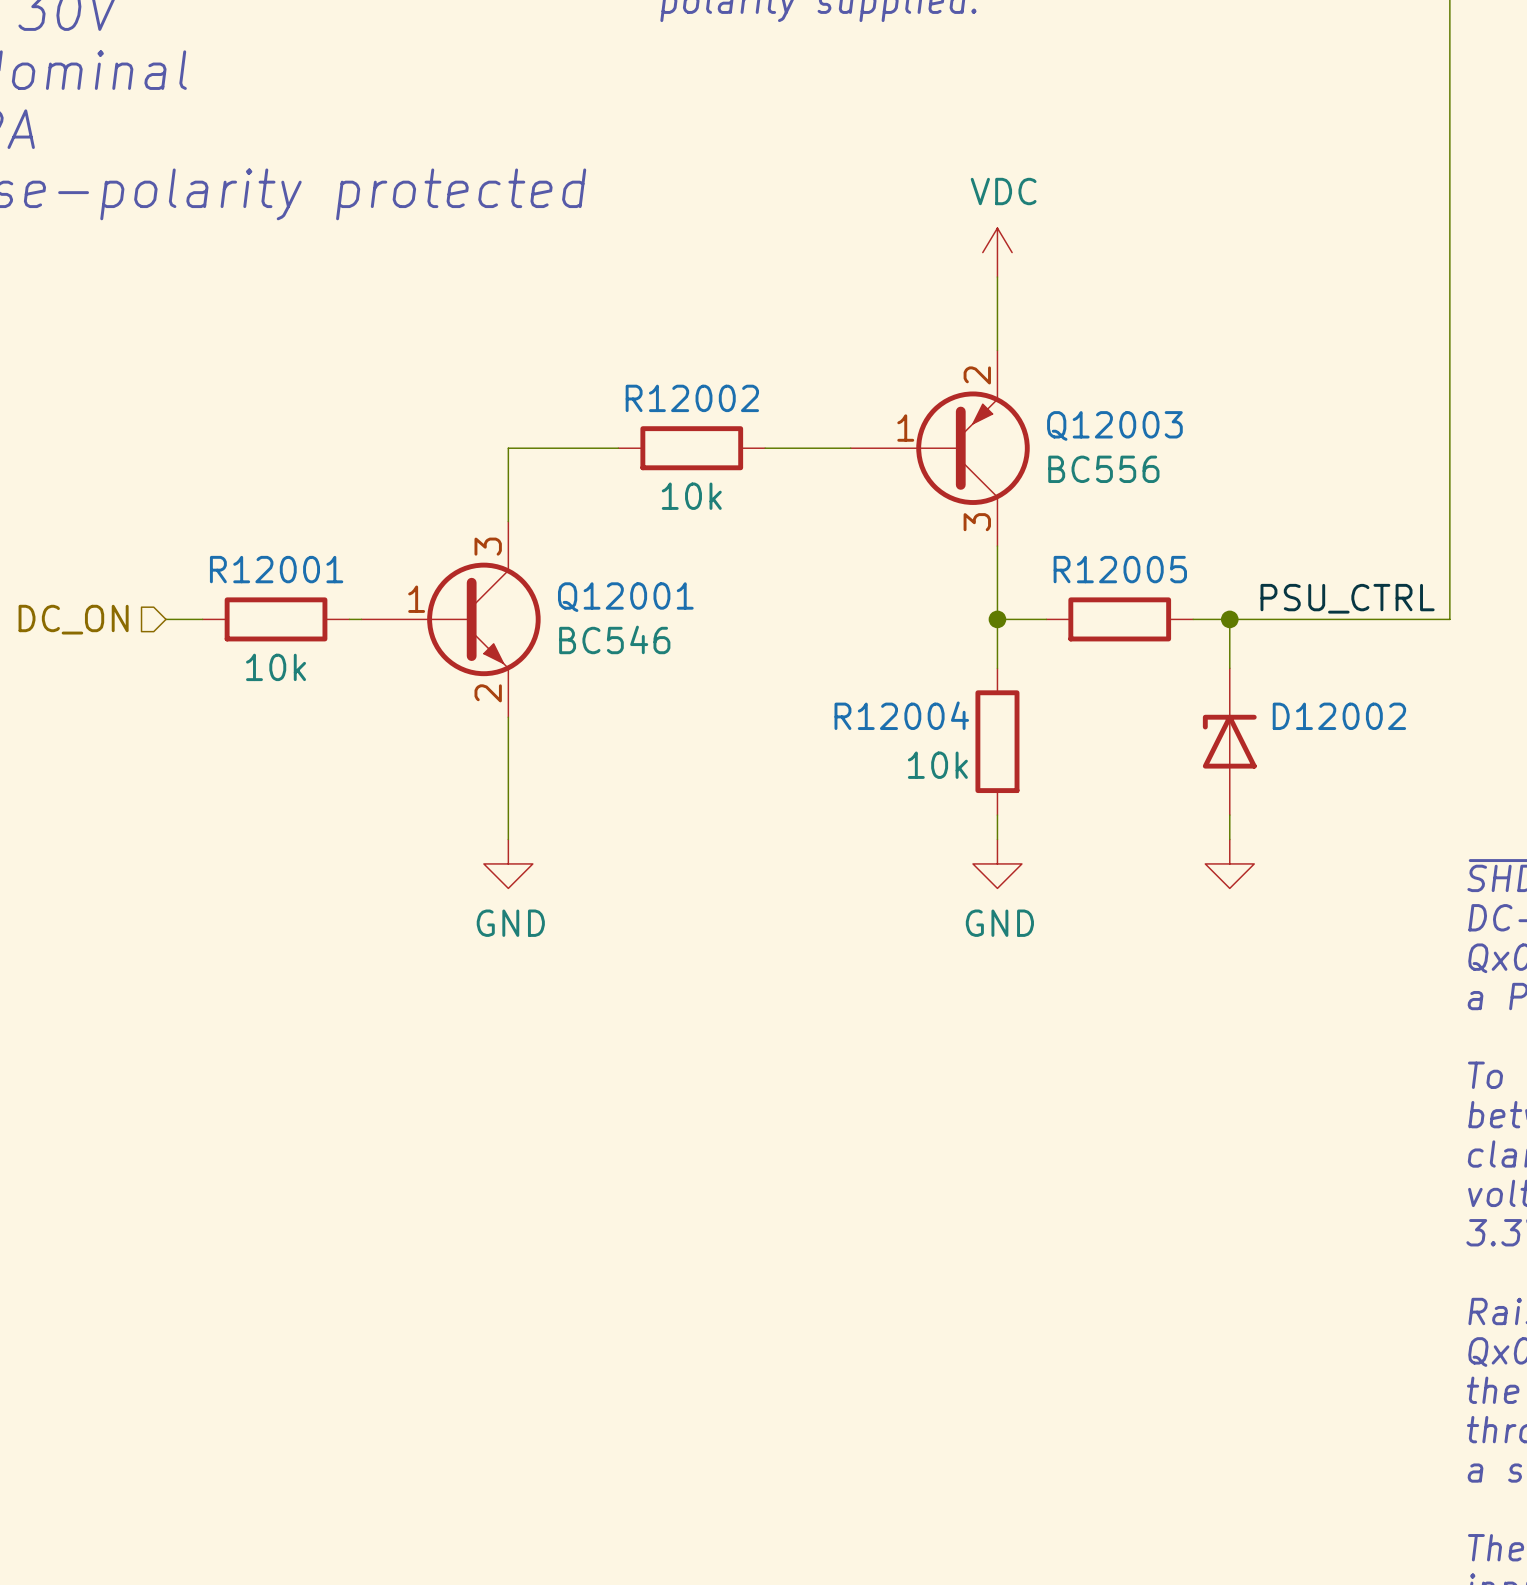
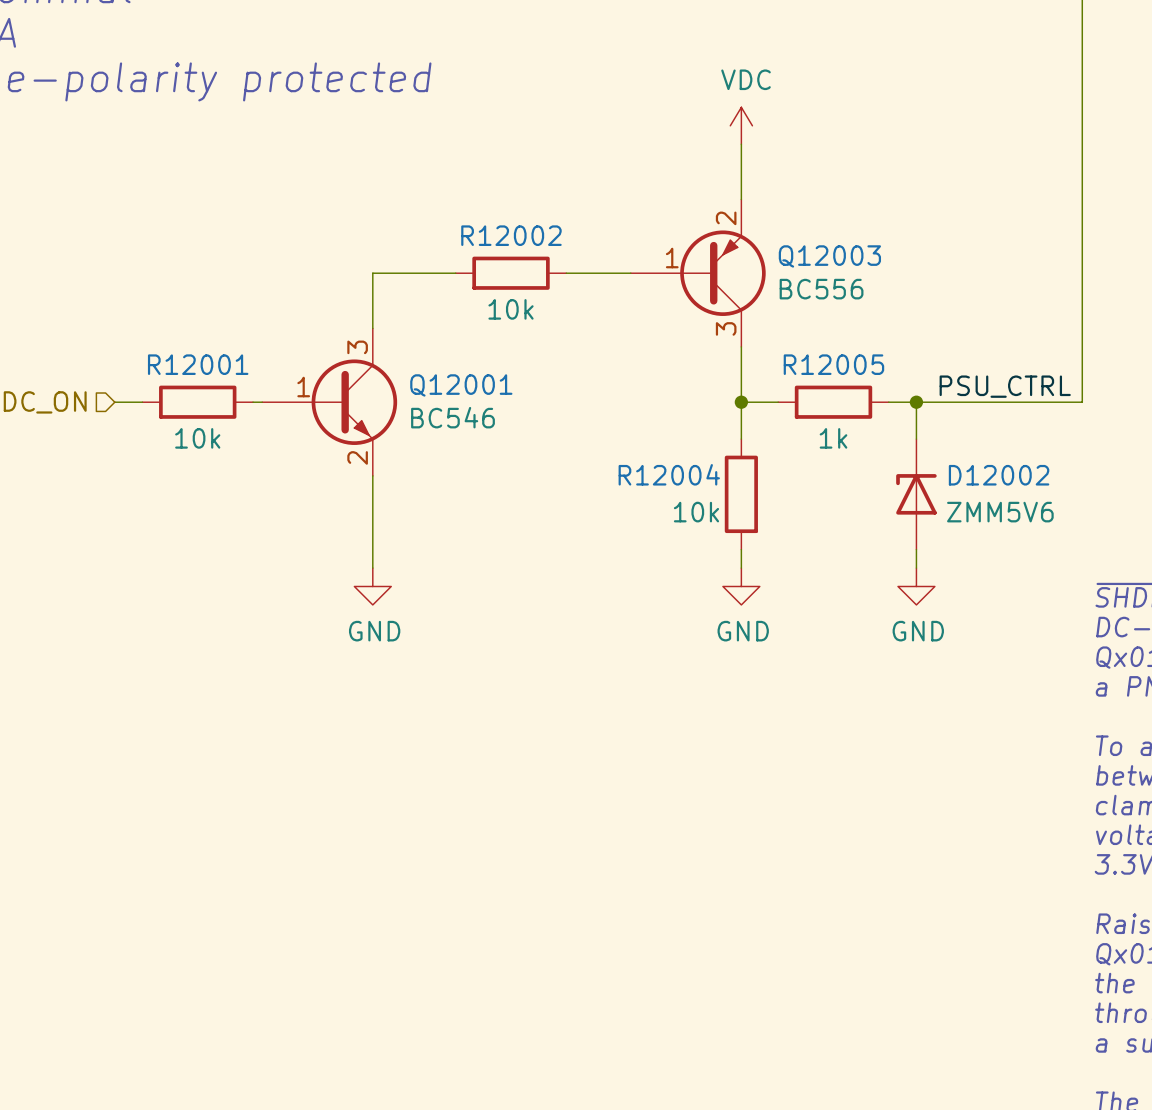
R12005 value: none -> 1k (833, 438)
D12002 value: none -> ZMM5V6 (1000, 512)
power symbol text: none -> GND (918, 631)

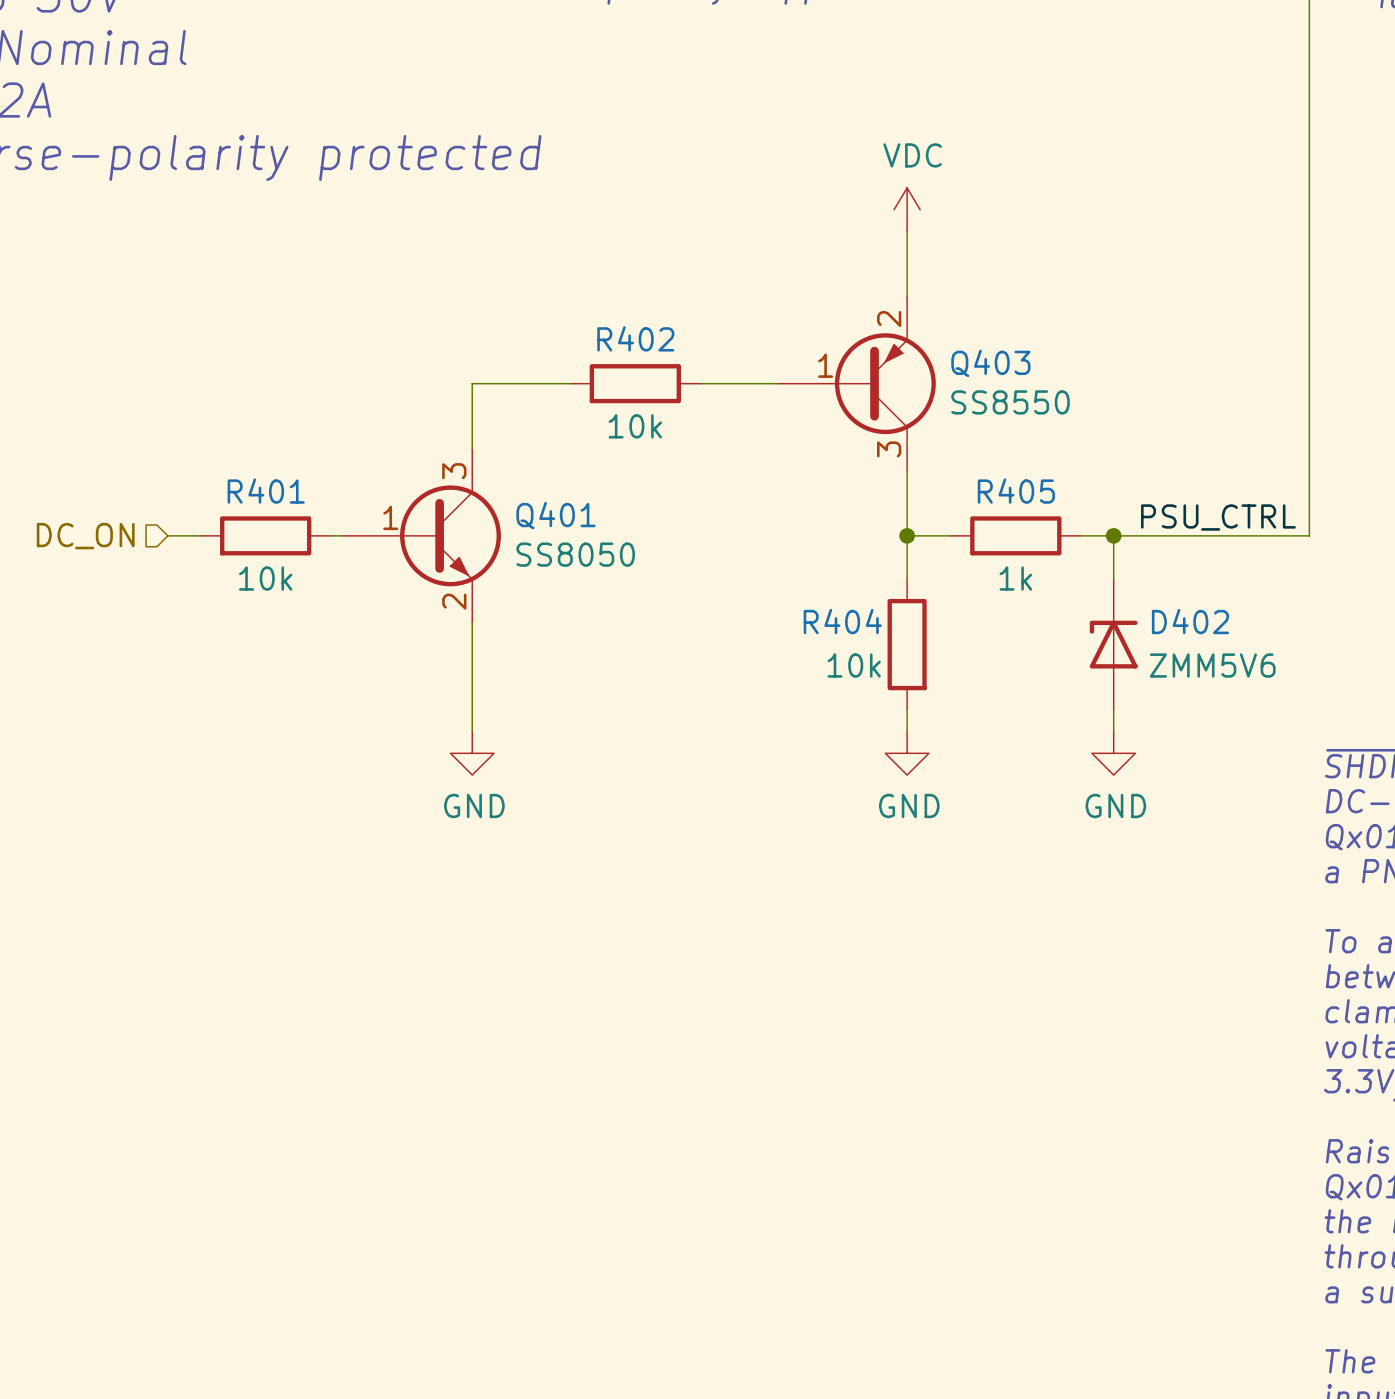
R12002 name: R12002 (511, 235) -> R402 (635, 338)
Q12003 name: Q12003 (829, 256) -> Q403 (990, 363)
Q12003 value: BC556 (821, 289) -> SS8550 (1010, 402)
R12001 name: R12001 (198, 364) -> R401 (266, 491)
R12005 name: R12005 (833, 364) -> R405 (1016, 491)
Q12001 name: Q12001 (461, 385) -> Q401 (555, 515)
Q12001 value: BC546 (452, 417) -> SS8050 (575, 554)
R12004 name: R12004 (669, 474) -> R404 (842, 621)
D12002 name: D12002 (999, 475) -> D402 (1190, 621)

